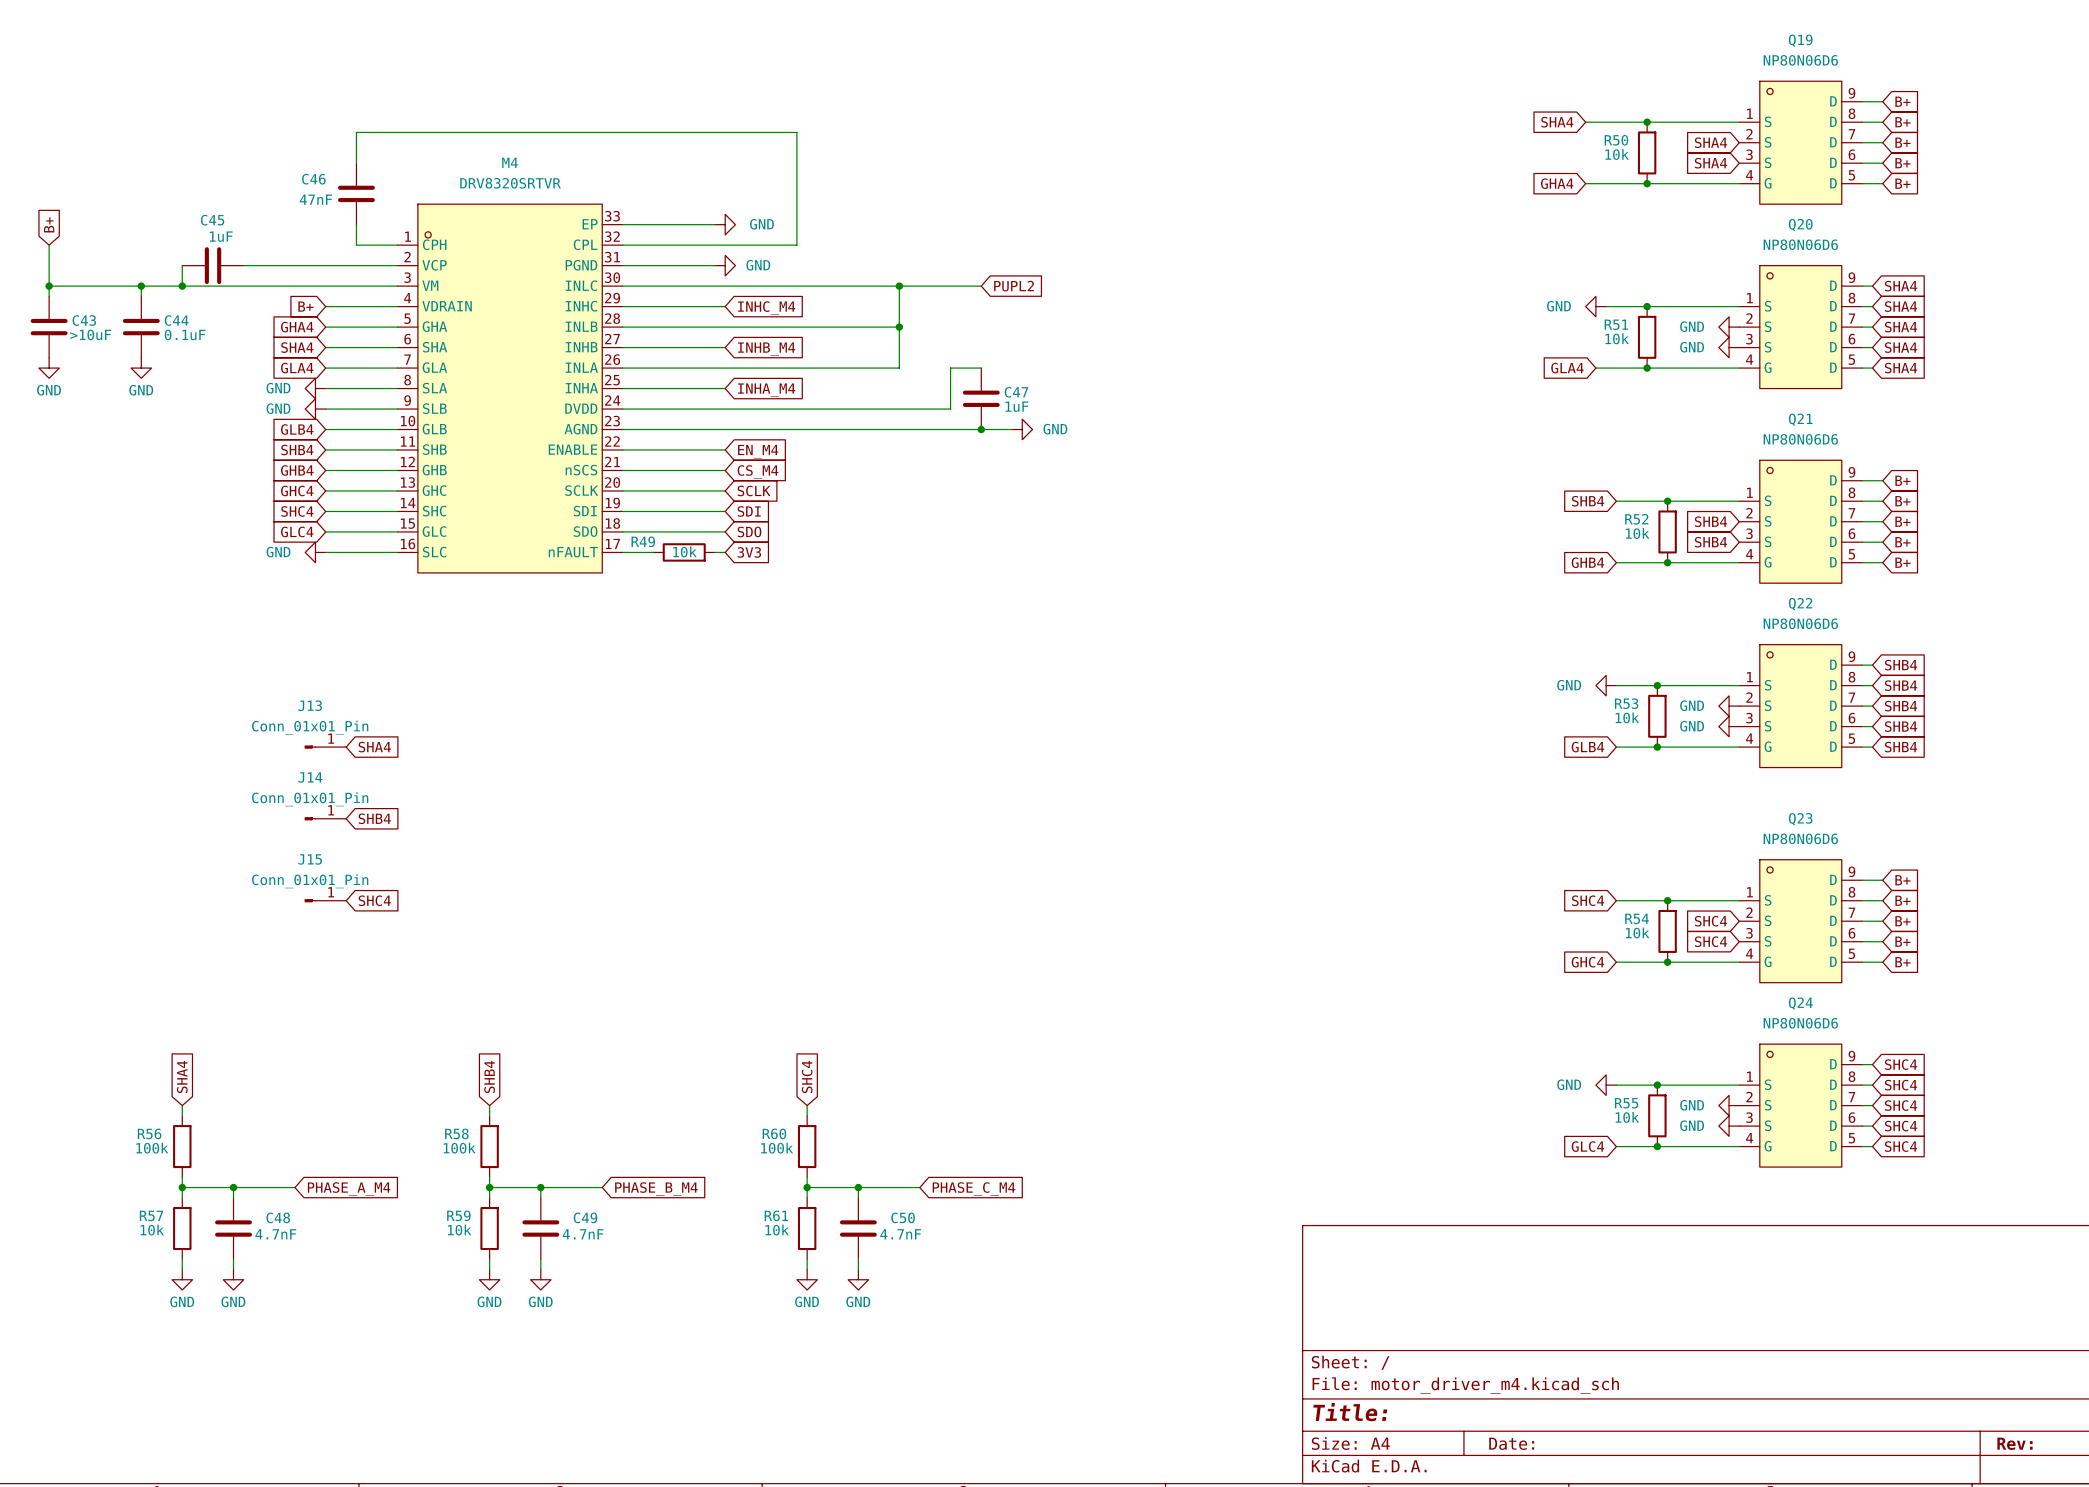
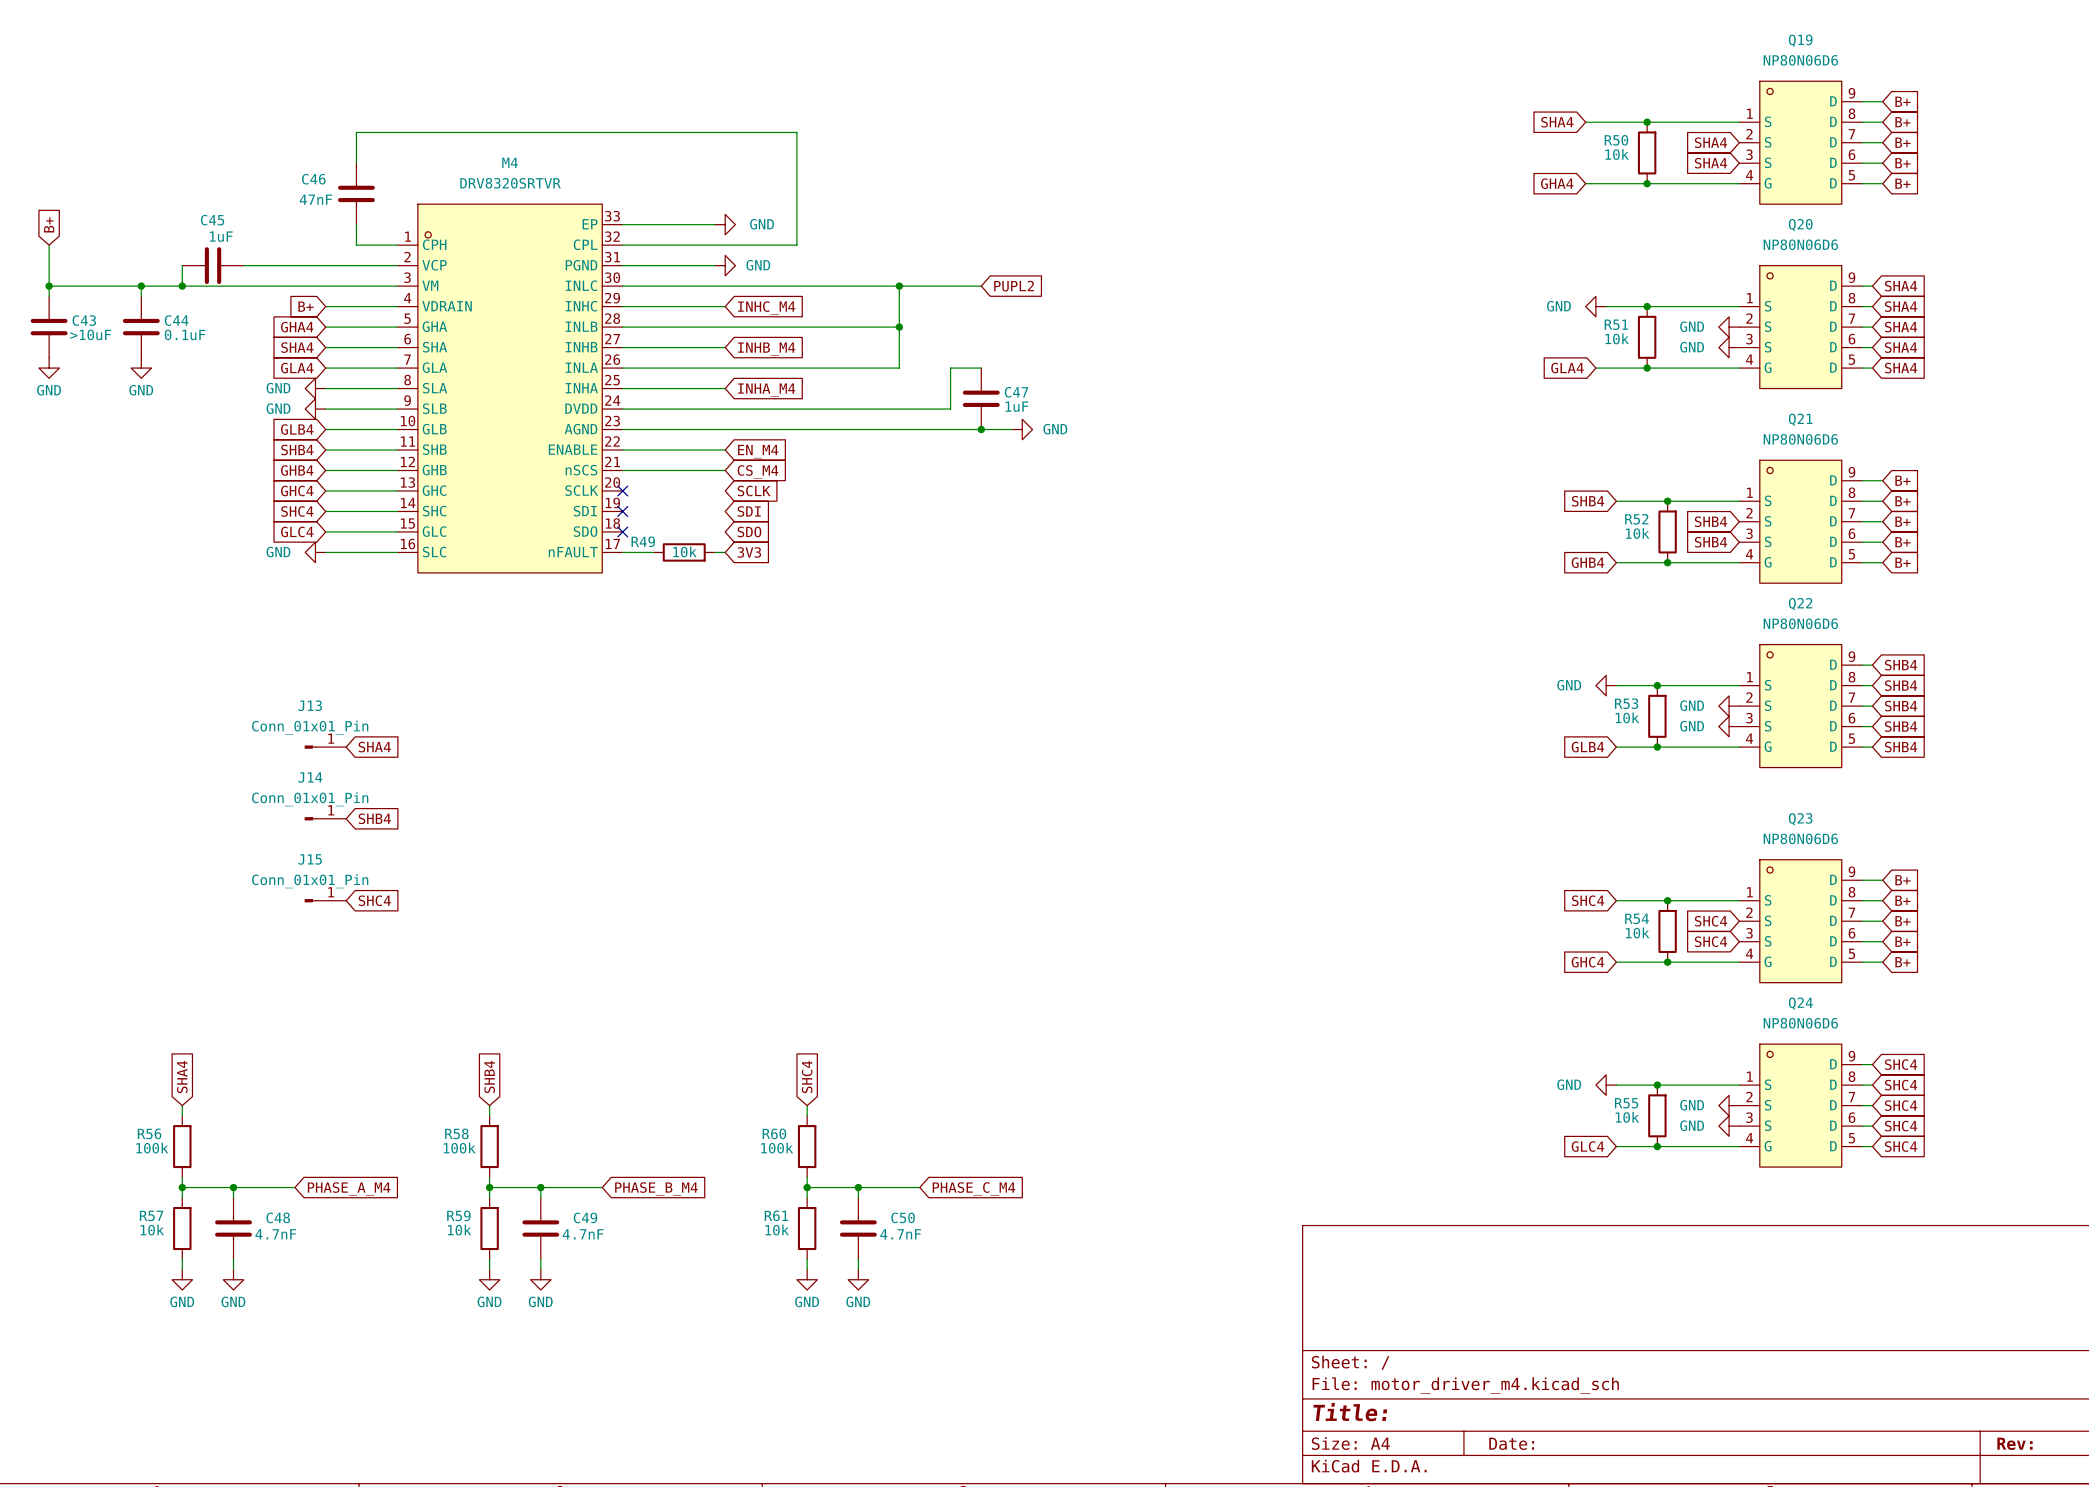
wire: (622, 490) (725, 490) -> none
no-connect mark: none -> (622, 490)
wire: (622, 511) (725, 511) -> none
no-connect mark: none -> (622, 511)
wire: (622, 531) (725, 531) -> none
no-connect mark: none -> (622, 531)

